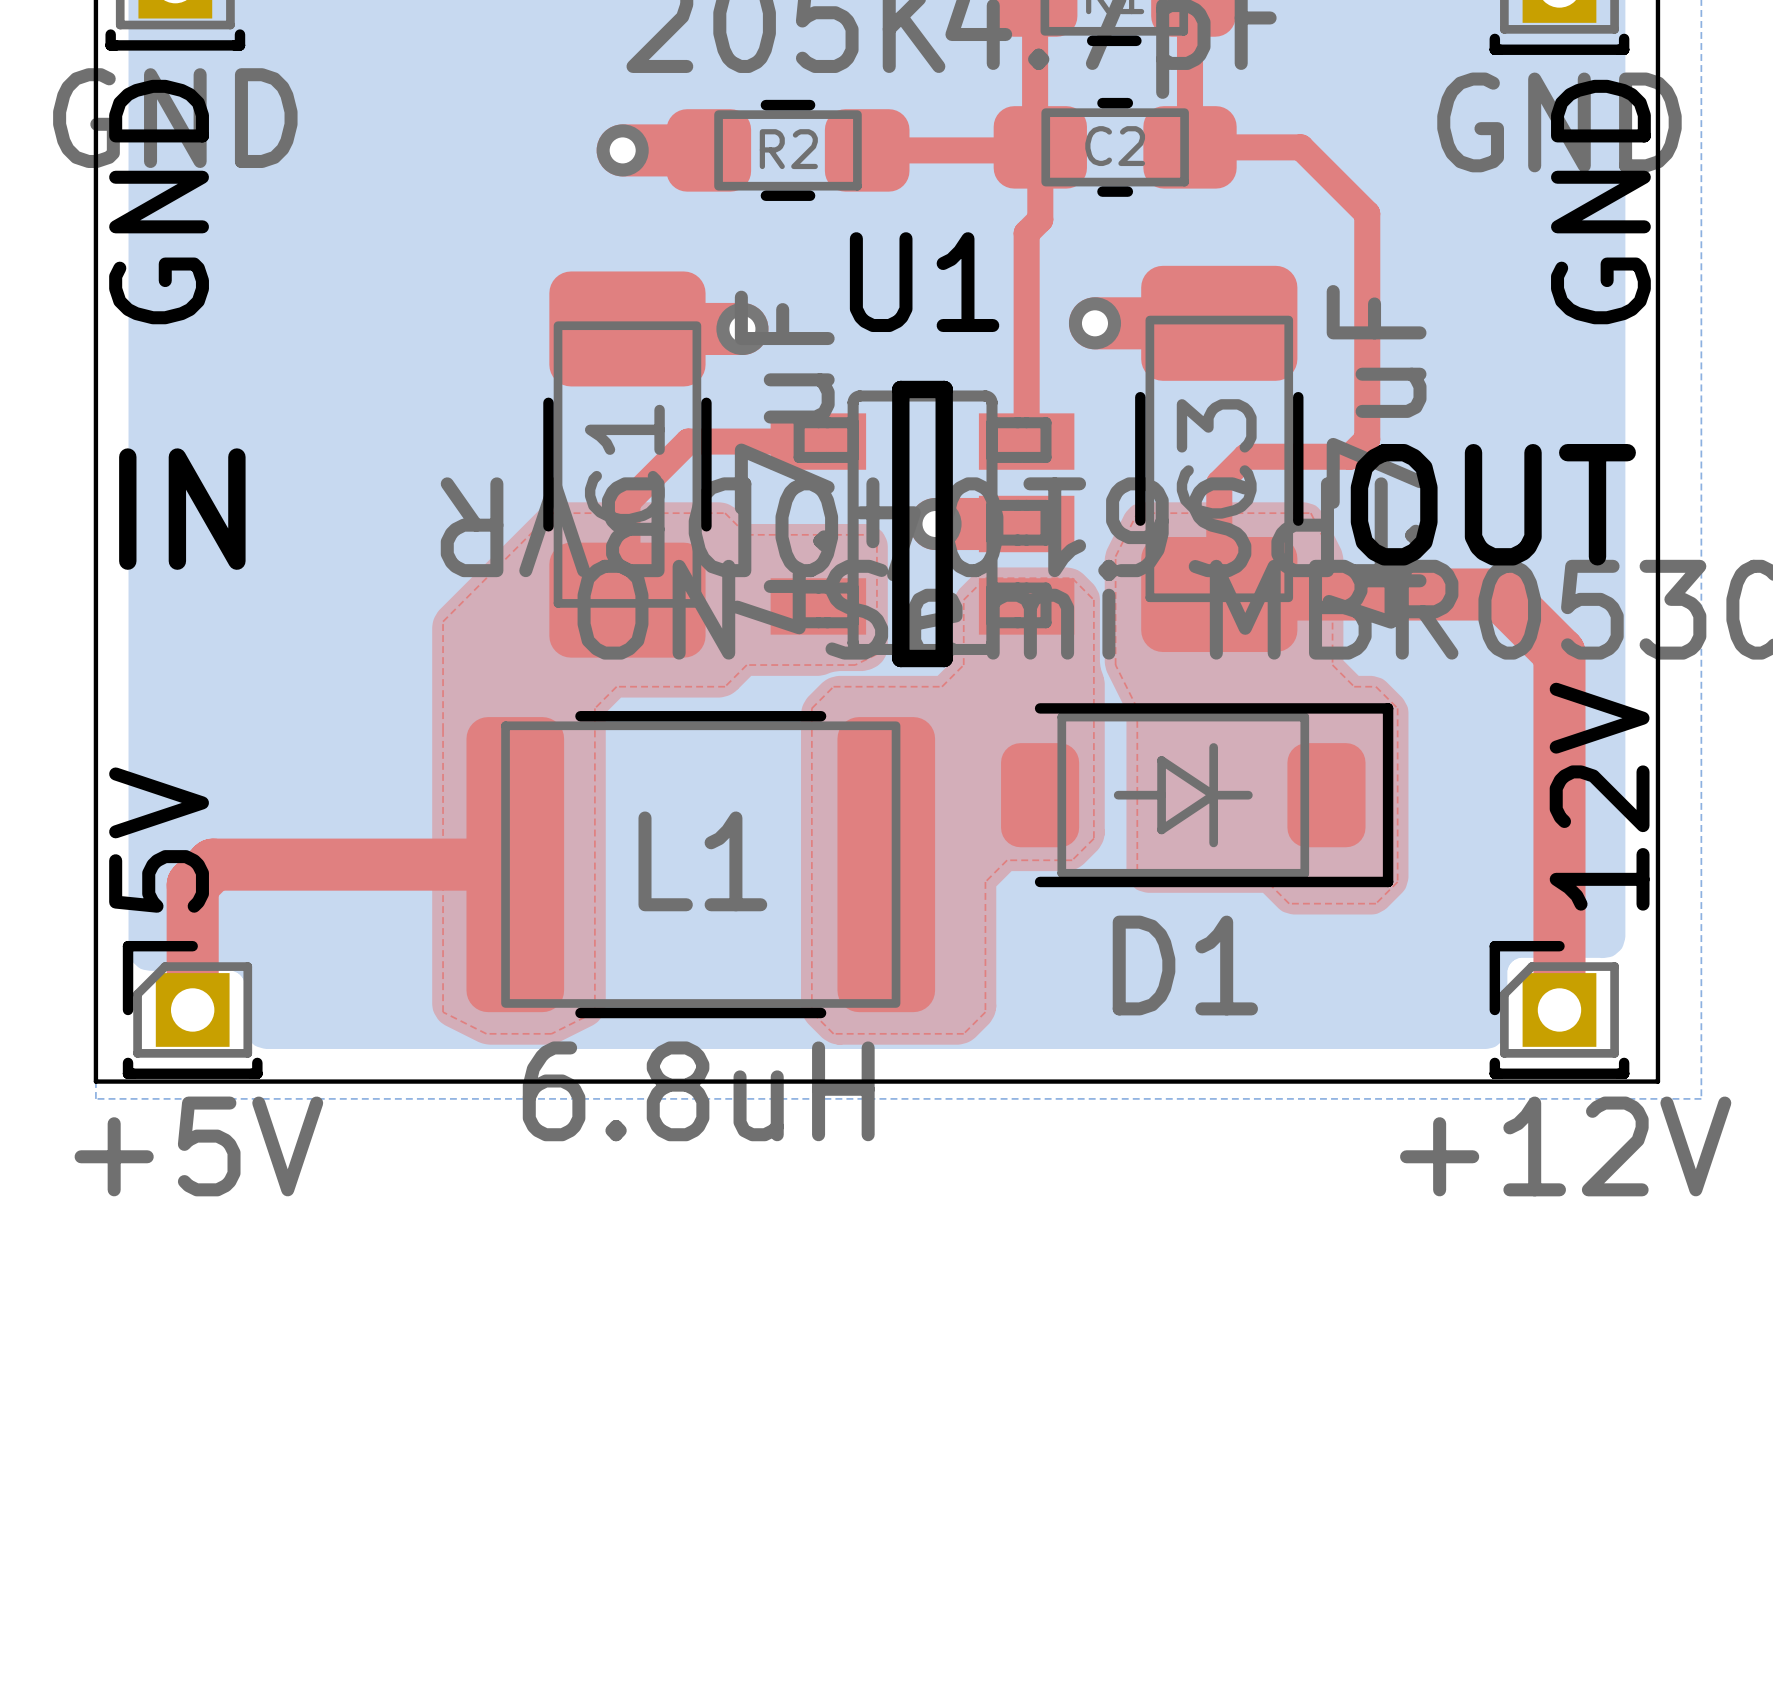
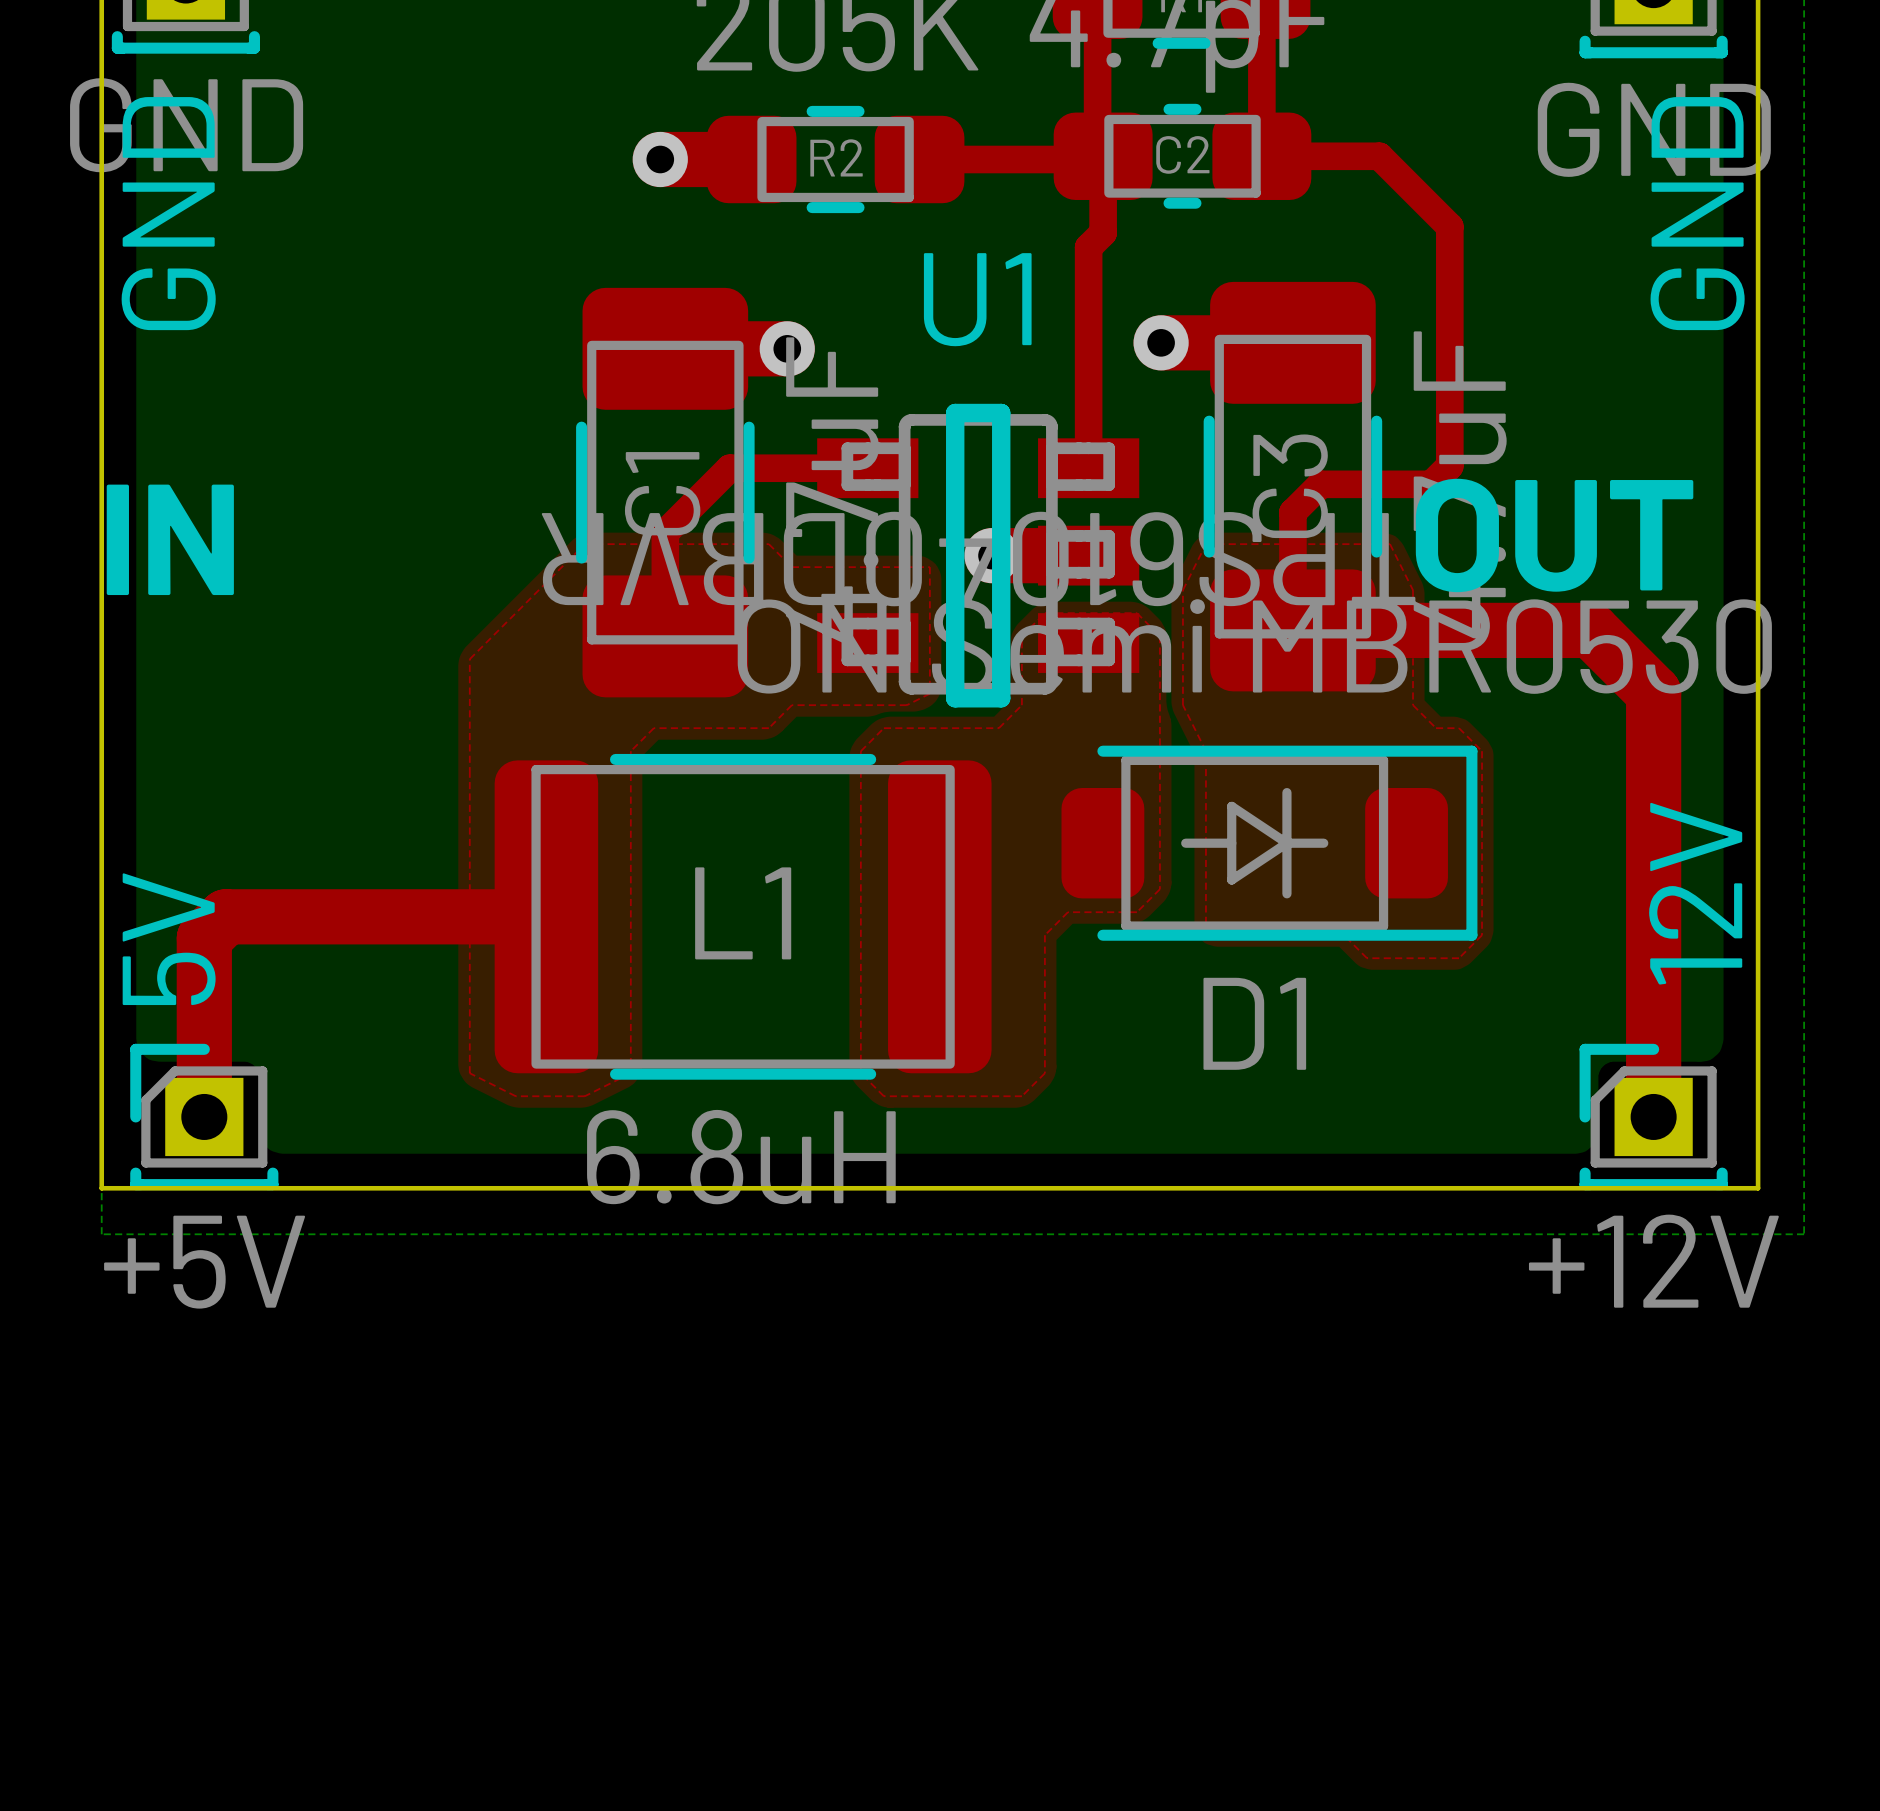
5V position: (192, 1009) -> (204, 1116)
12V position: (1559, 1009) -> (1653, 1116)
board edge: (95, 1081) (1657, 1081) -> (101, 1146) (101, 1188) (1758, 1188) (1758, 1146)
bottom zone outline: (95, 1098) (1701, 1098) -> (101, 1165) (101, 1234) (1804, 1234) (1804, 1165)

